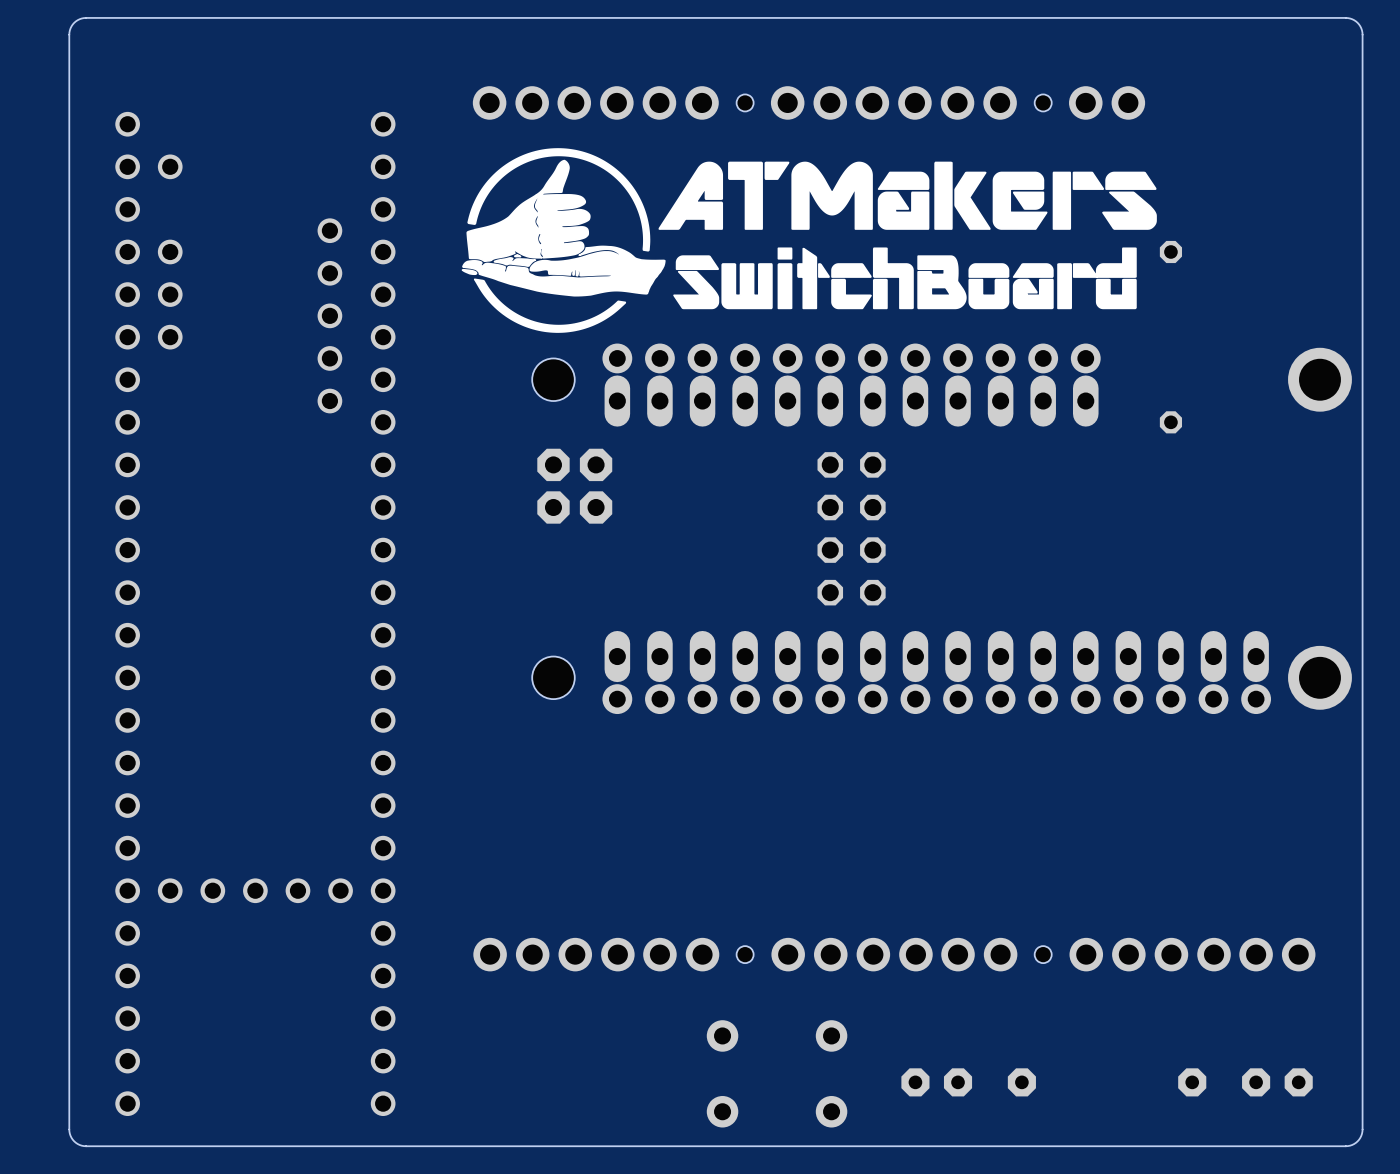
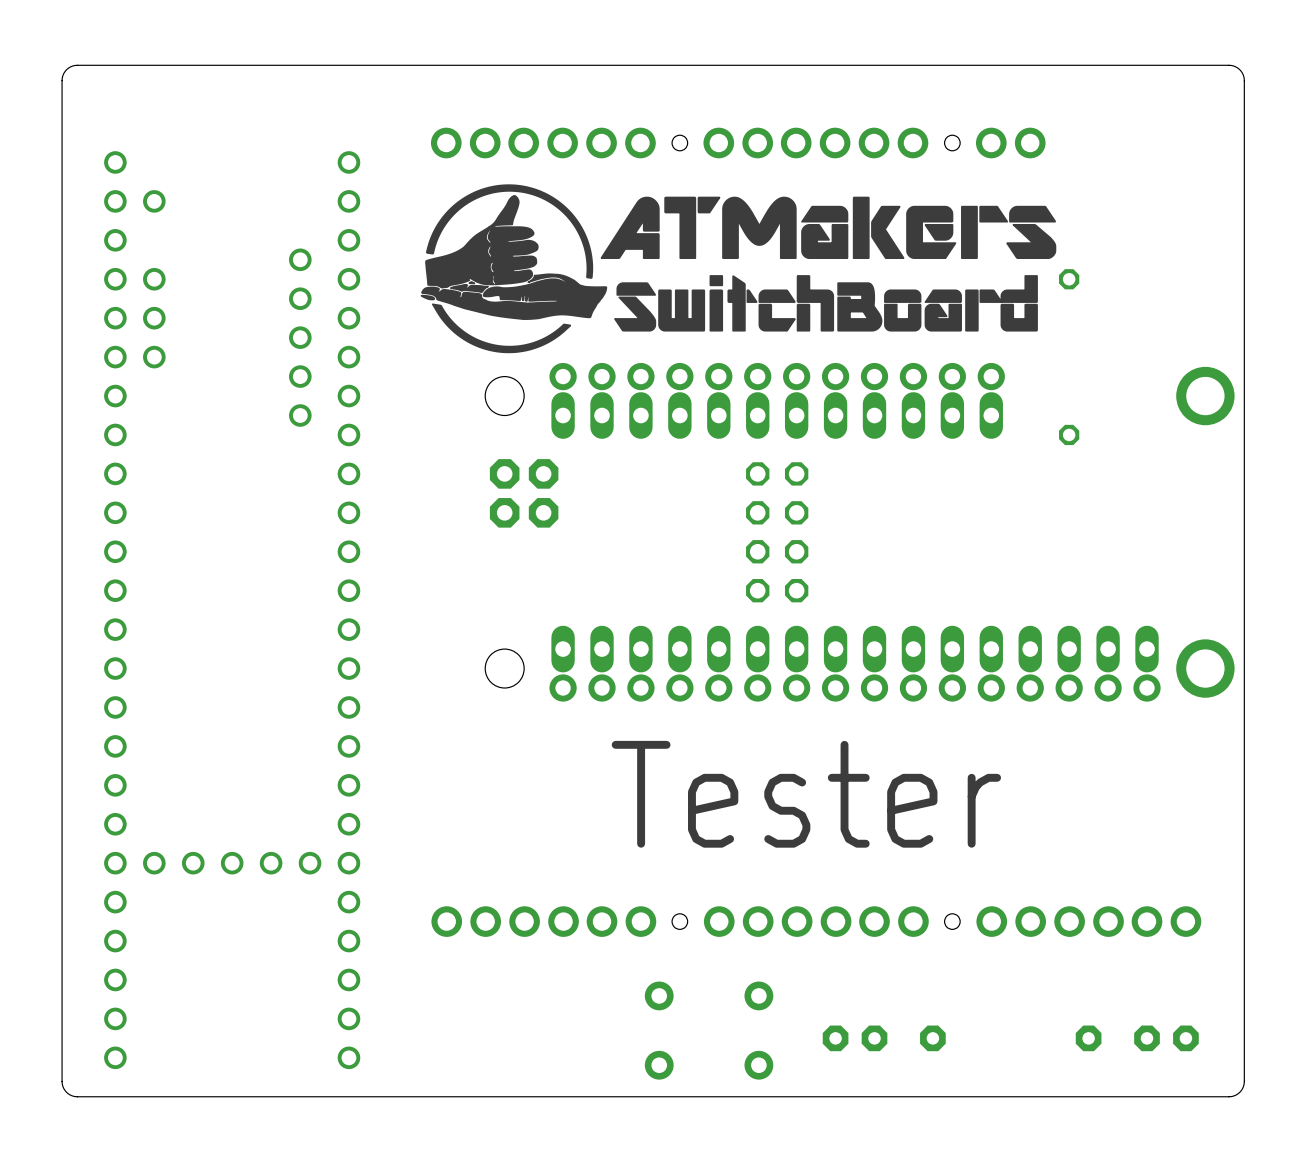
text: none -> Tester (806, 794)

